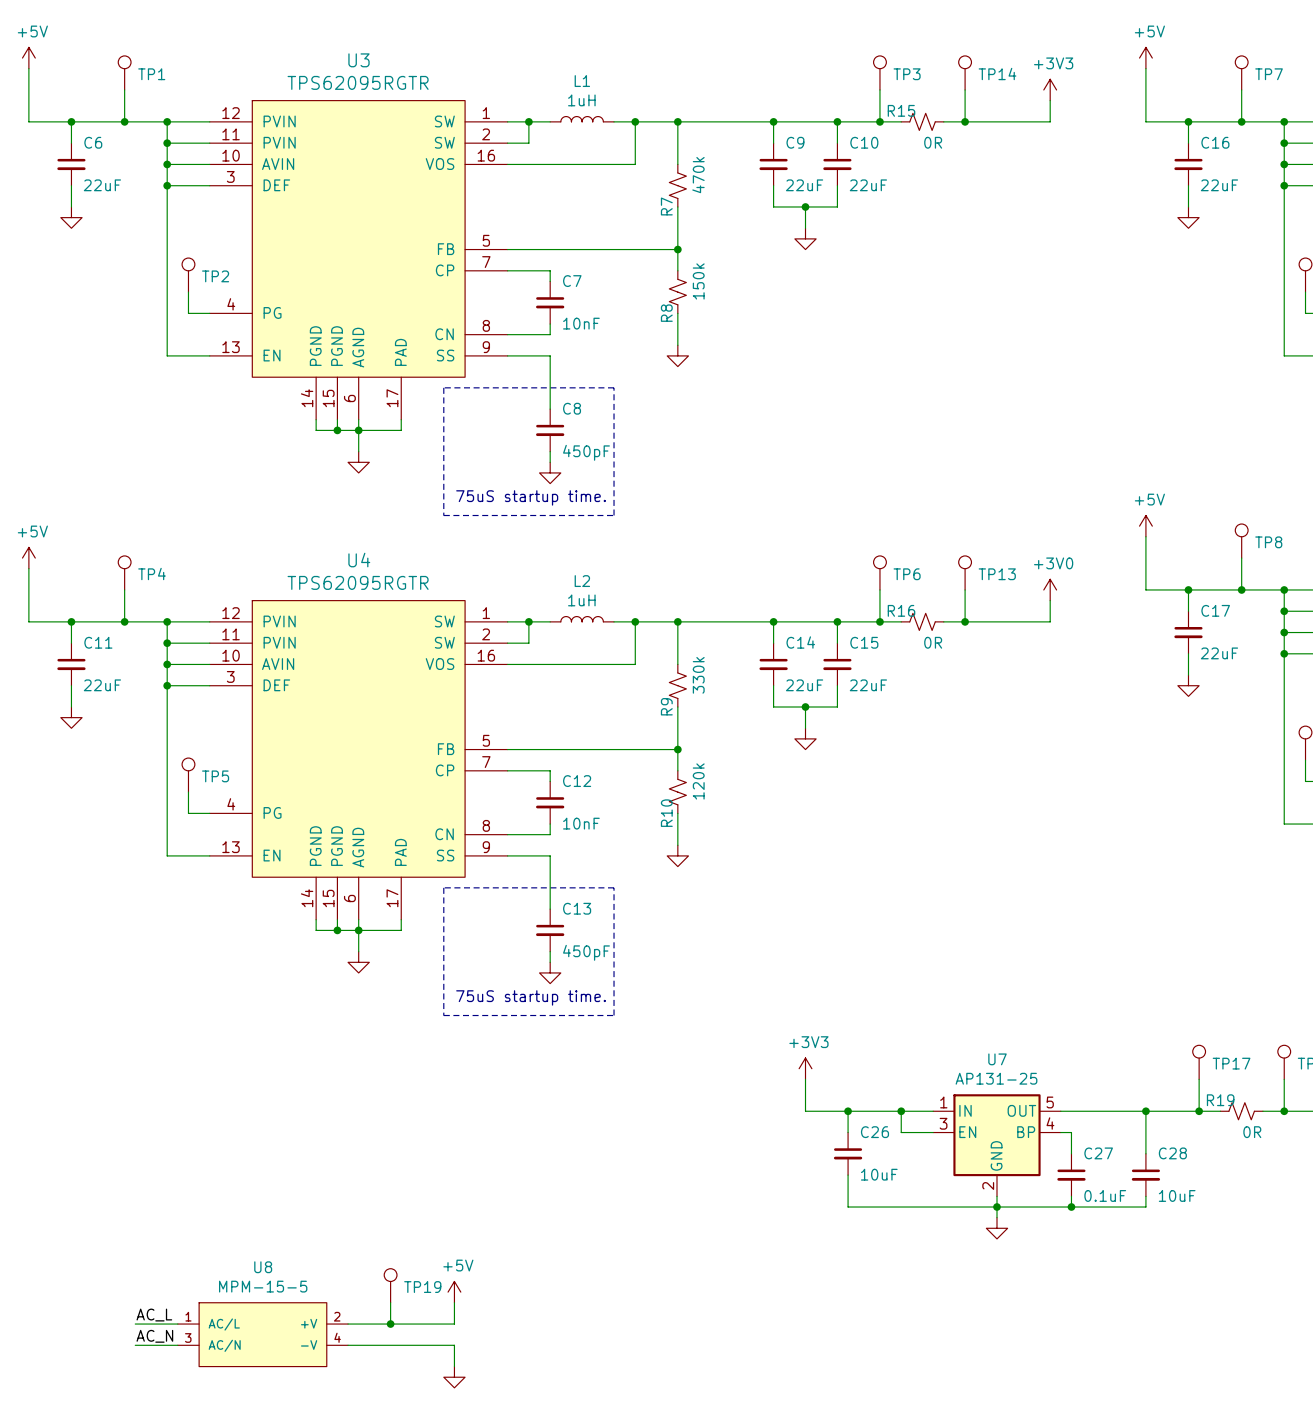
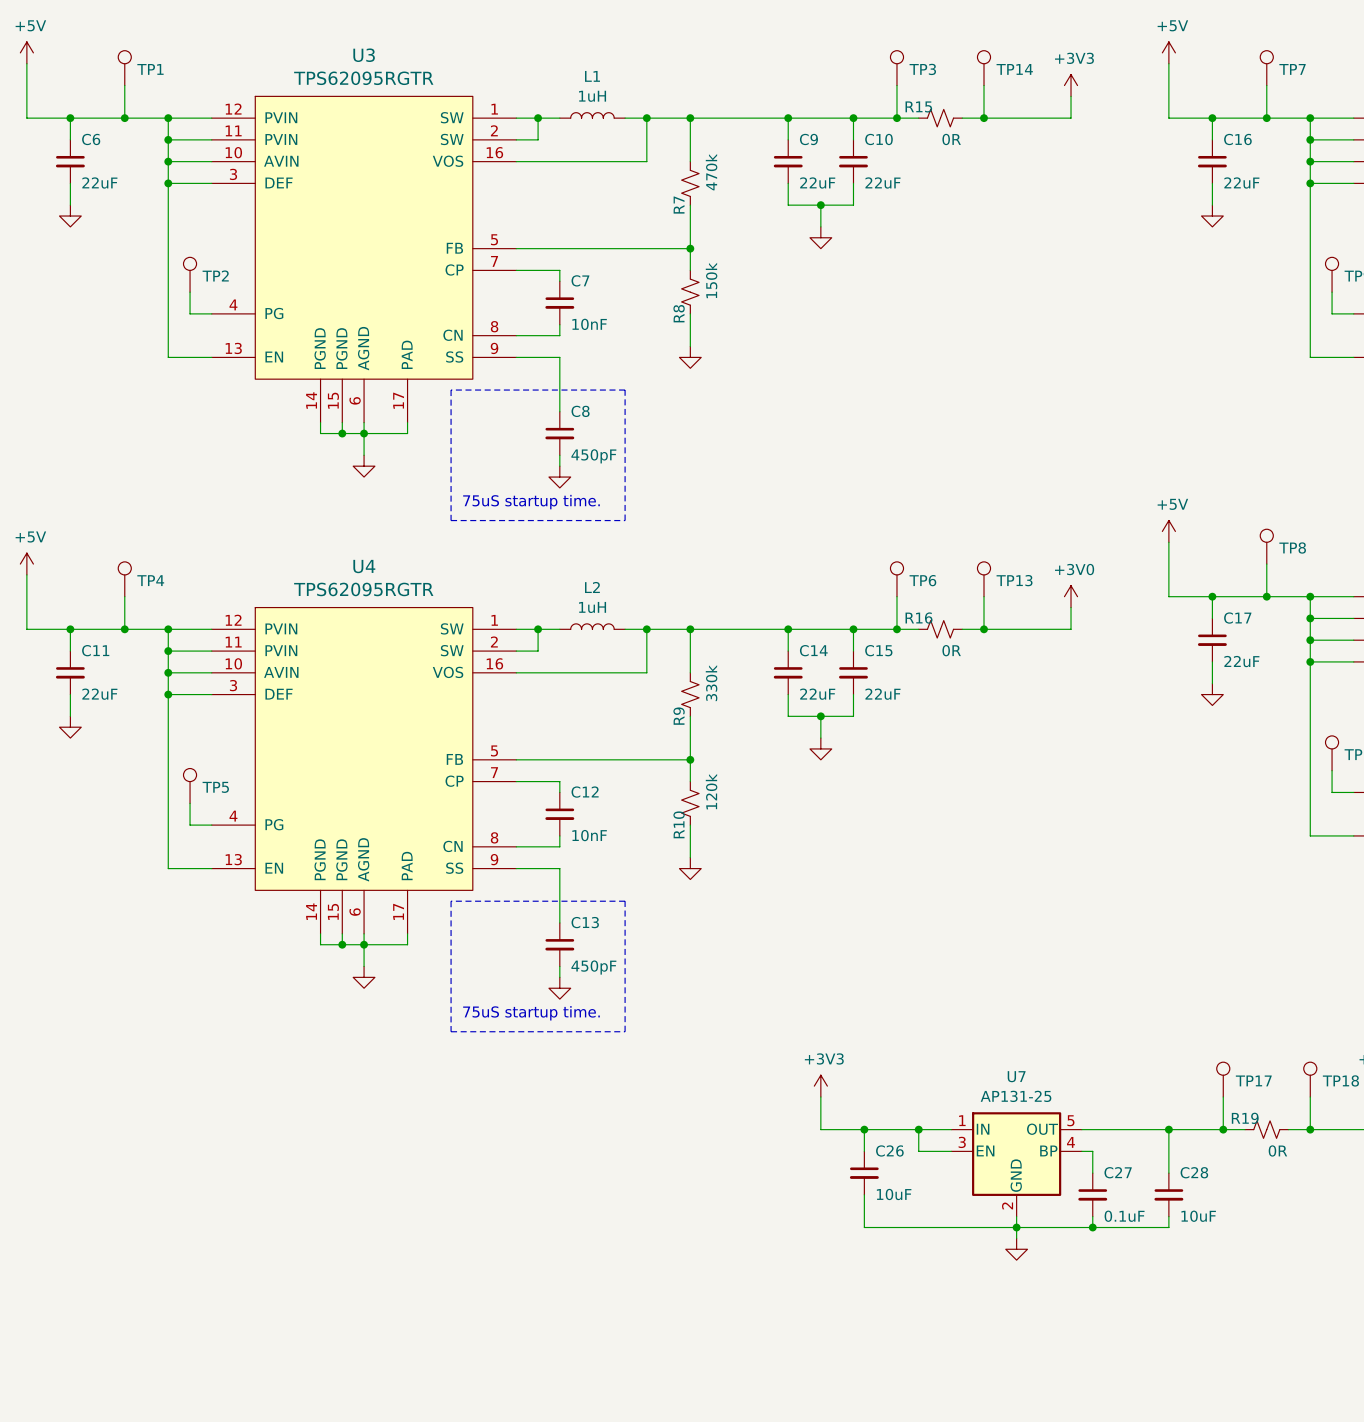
TP19: (390, 1285) -> none
power symbol: +5V (454, 1292) -> none
wire: (390, 1302) (390, 1324) -> none
wire: (454, 1302) (454, 1324) (348, 1324) -> none
label: AC_L (154, 1315) -> none
wire: (135, 1324) (177, 1324) -> none
junction: (390, 1324) -> none
U8: MPM-15-5 (262, 1334) -> none
label: AC_N (154, 1336) -> none
wire: (135, 1345) (177, 1345) -> none
wire: (348, 1345) (454, 1345) (454, 1366) -> none
power symbol: (454, 1377) -> none

